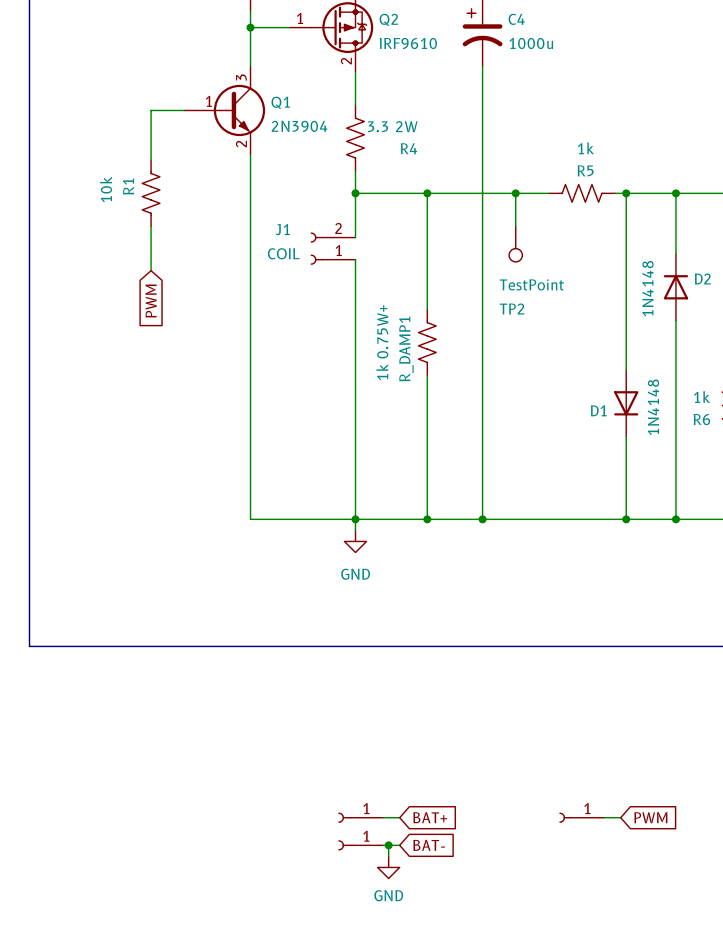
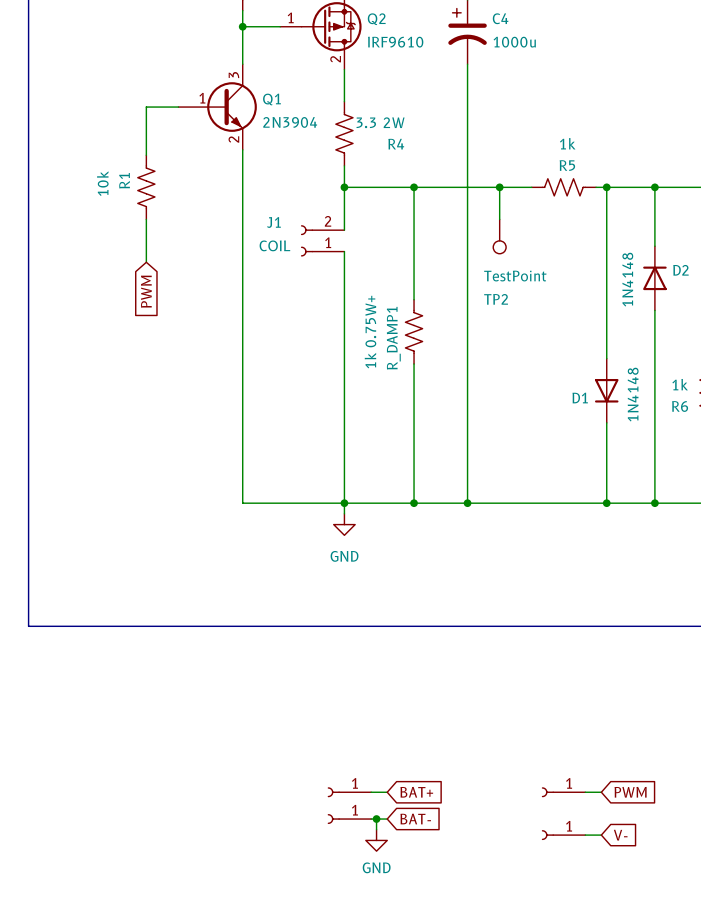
part: none -> (563, 835)
wire: none -> (585, 835) (601, 835)
global label: none -> V- (620, 835)

